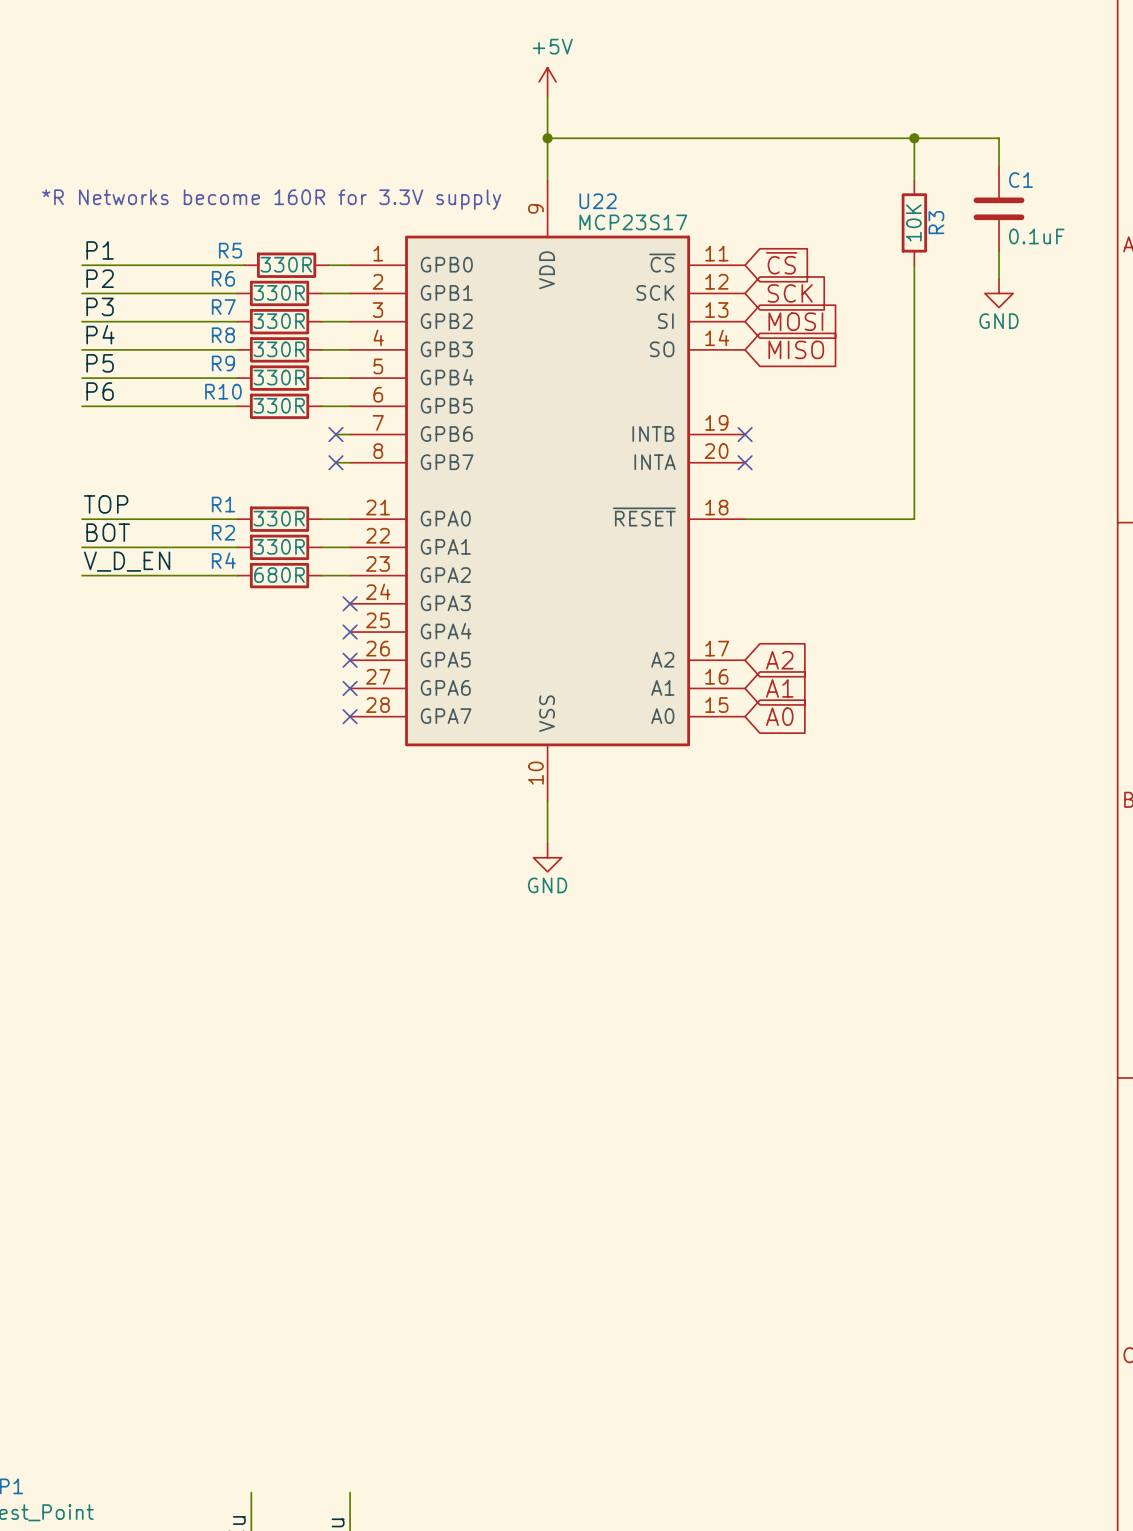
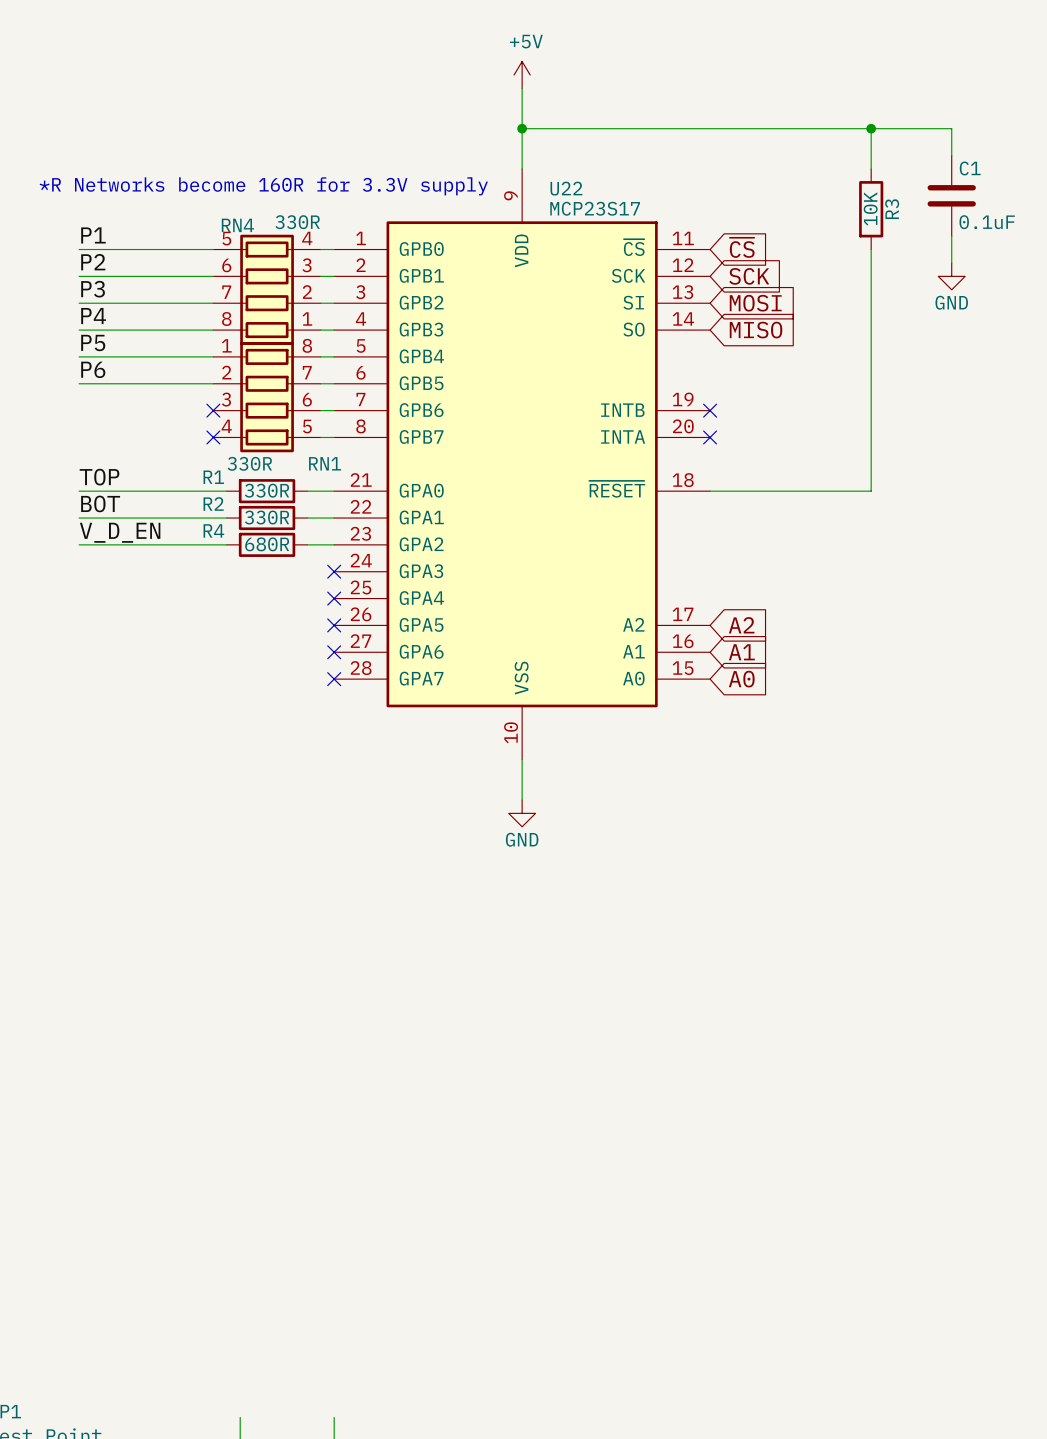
R5: 330R (286, 265) -> none
R6: 330R (279, 293) -> none
RN4: none -> 330R (267, 289)
R7: 330R (279, 321) -> none
R8: 330R (279, 349) -> none
R9: 330R (279, 378) -> none
R10: 330R (279, 406) -> none
RN1: none -> 330R (267, 397)
no-connect mark: none -> (213, 410)
no-connect mark: (335, 434) -> none
no-connect mark: none -> (213, 437)
no-connect mark: (335, 462) -> none

